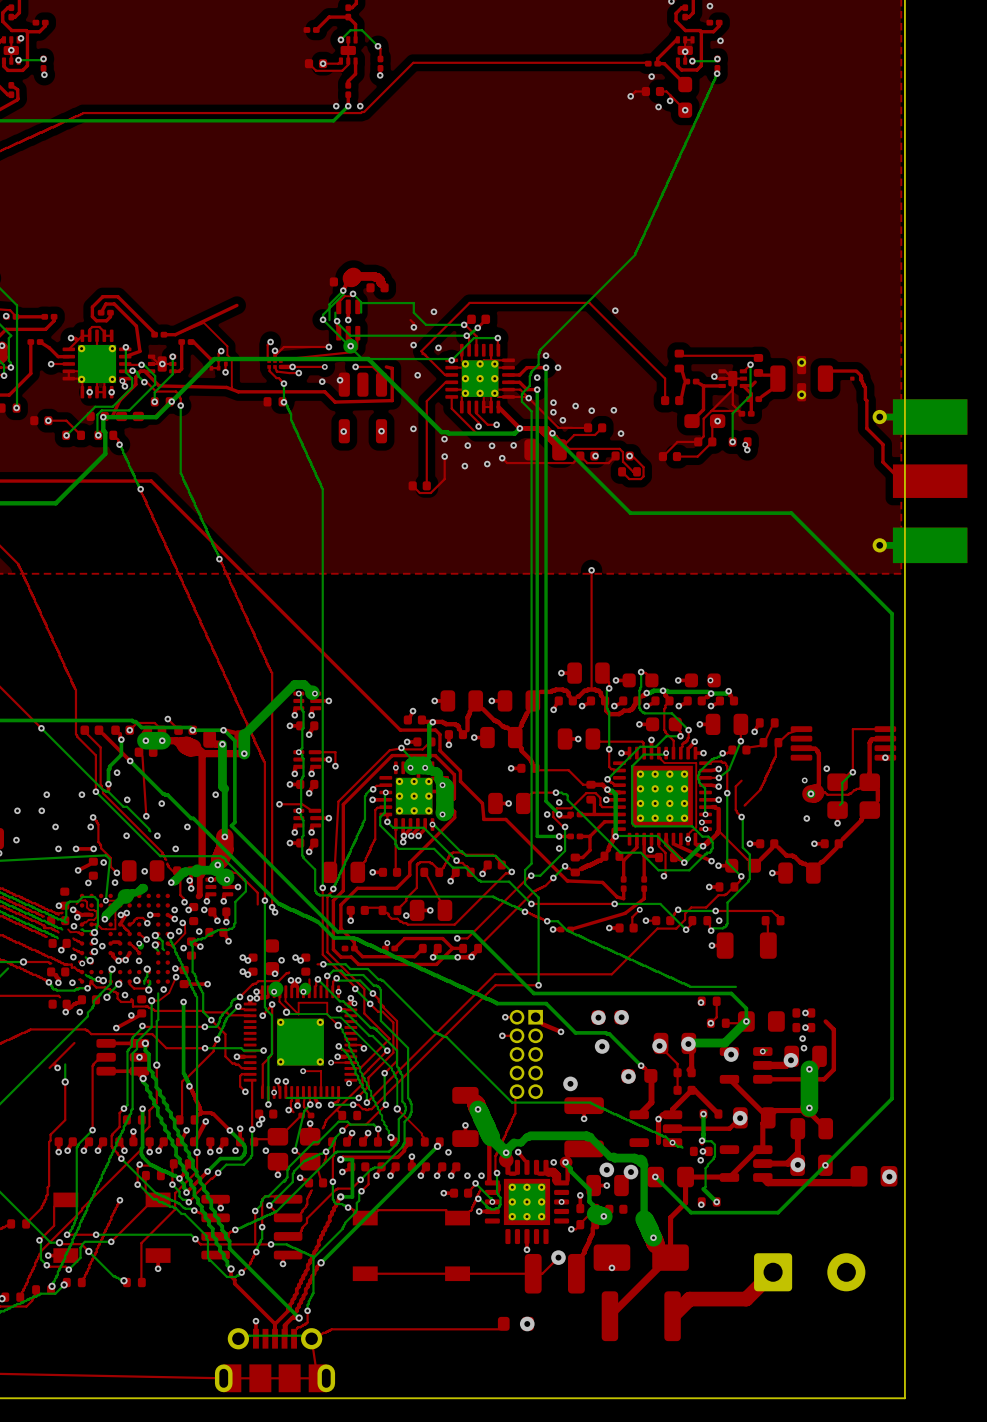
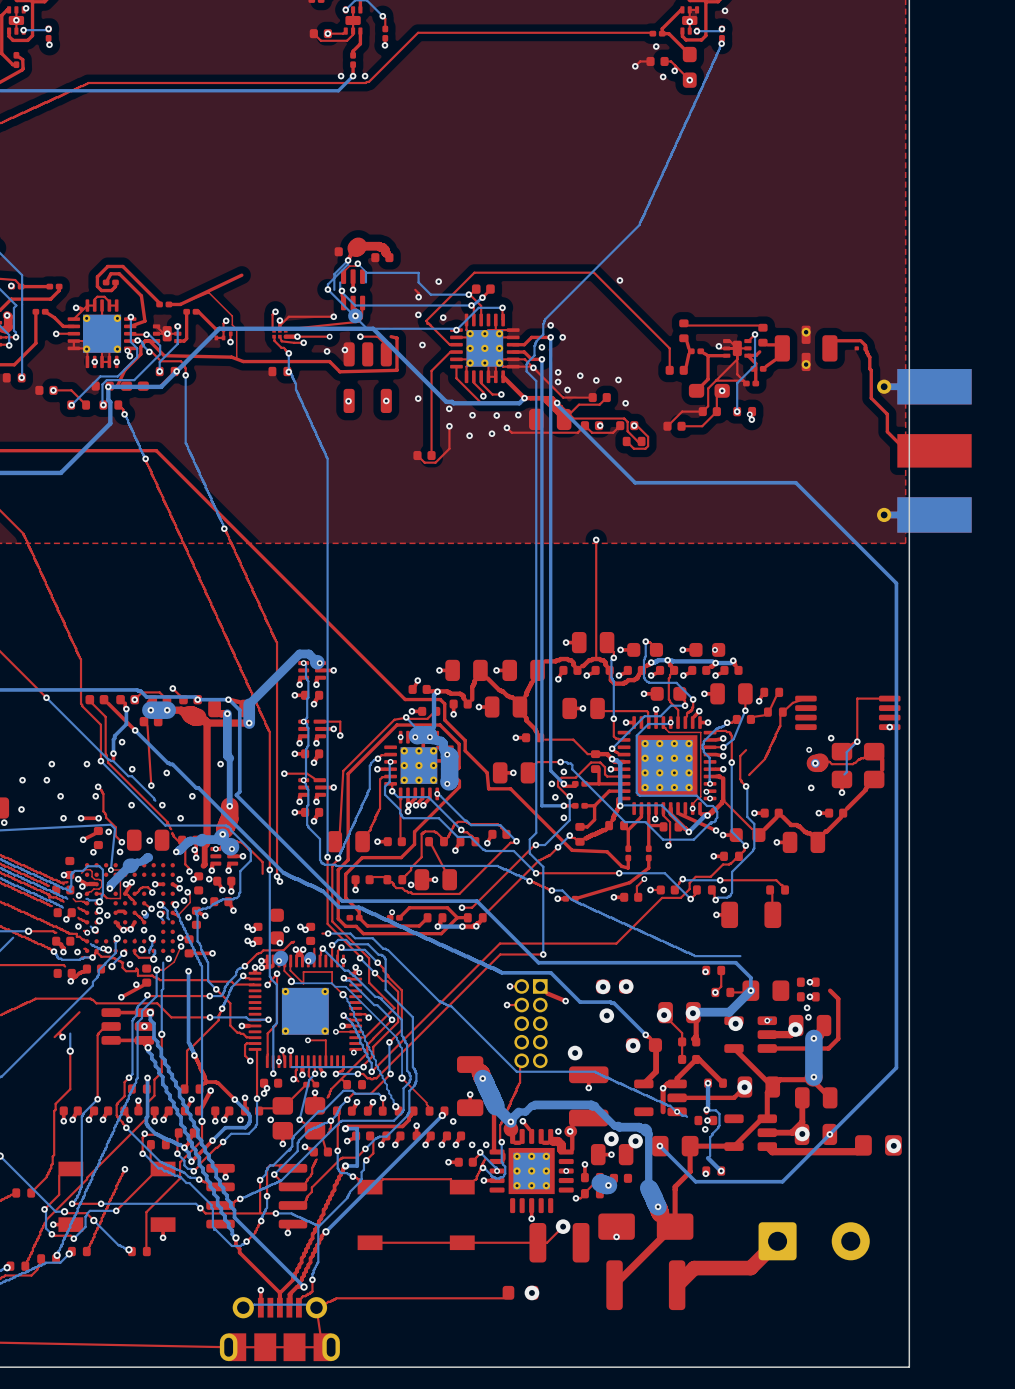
top track: (875, 739) (871, 739) (869, 742) (869, 773) -> none
top track: (811, 748) (815, 748) (818, 753) (818, 784) -> none
bottom track: (566, 1164) (589, 1189) (589, 1201) (593, 1206) -> none
top track: (592, 1228) (592, 1234) (582, 1254) -> none

